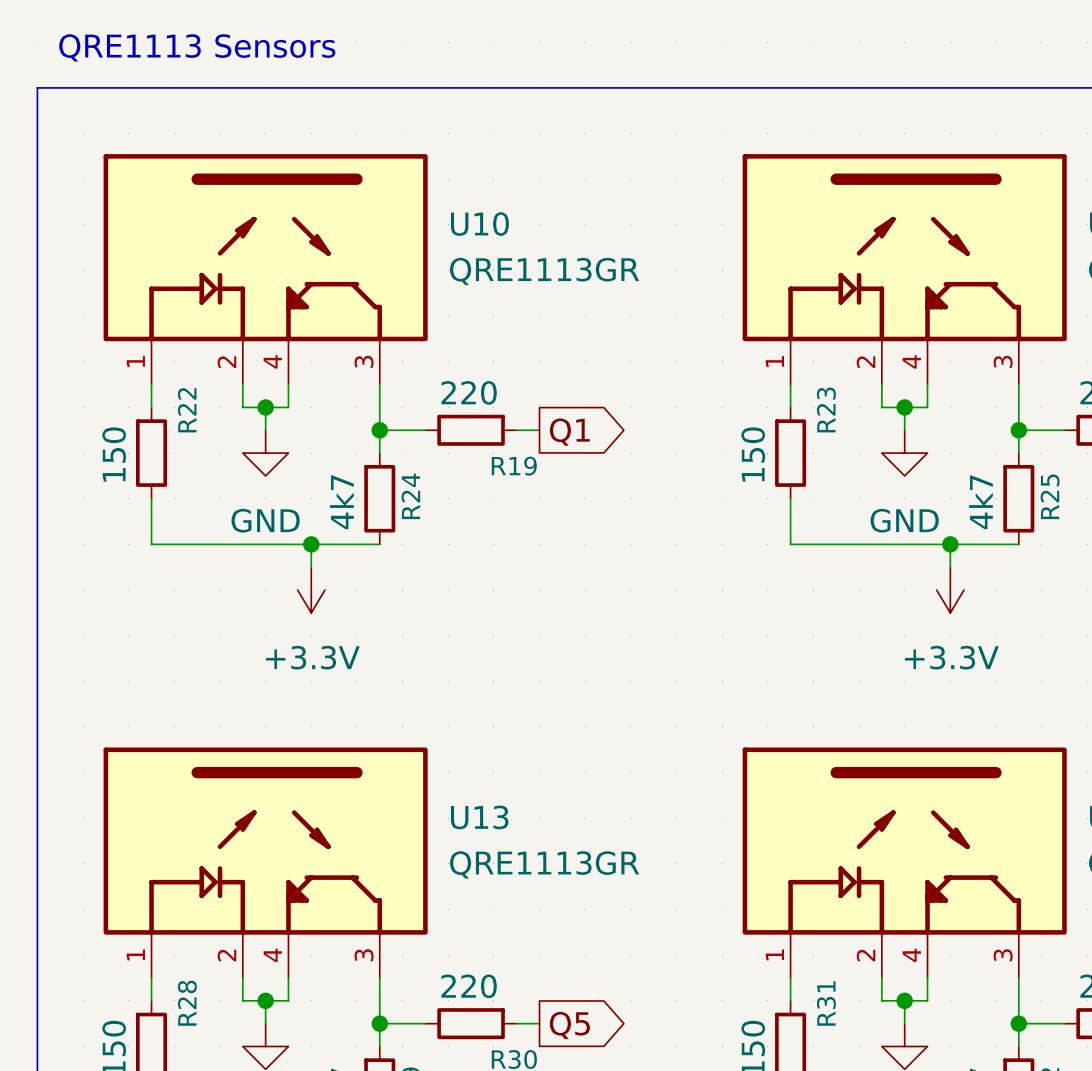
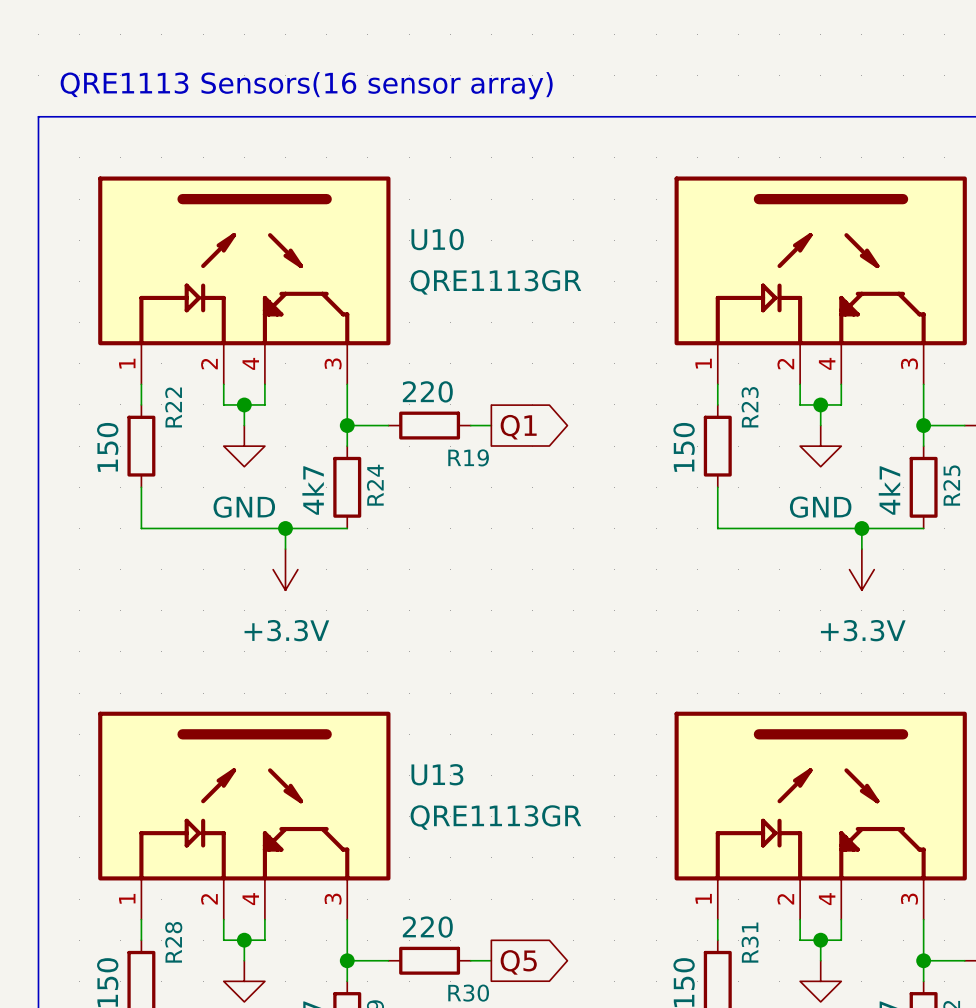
text: QRE1113 Sensors (197, 47) -> QRE1113 Sensors(16 sensor array) (306, 85)

